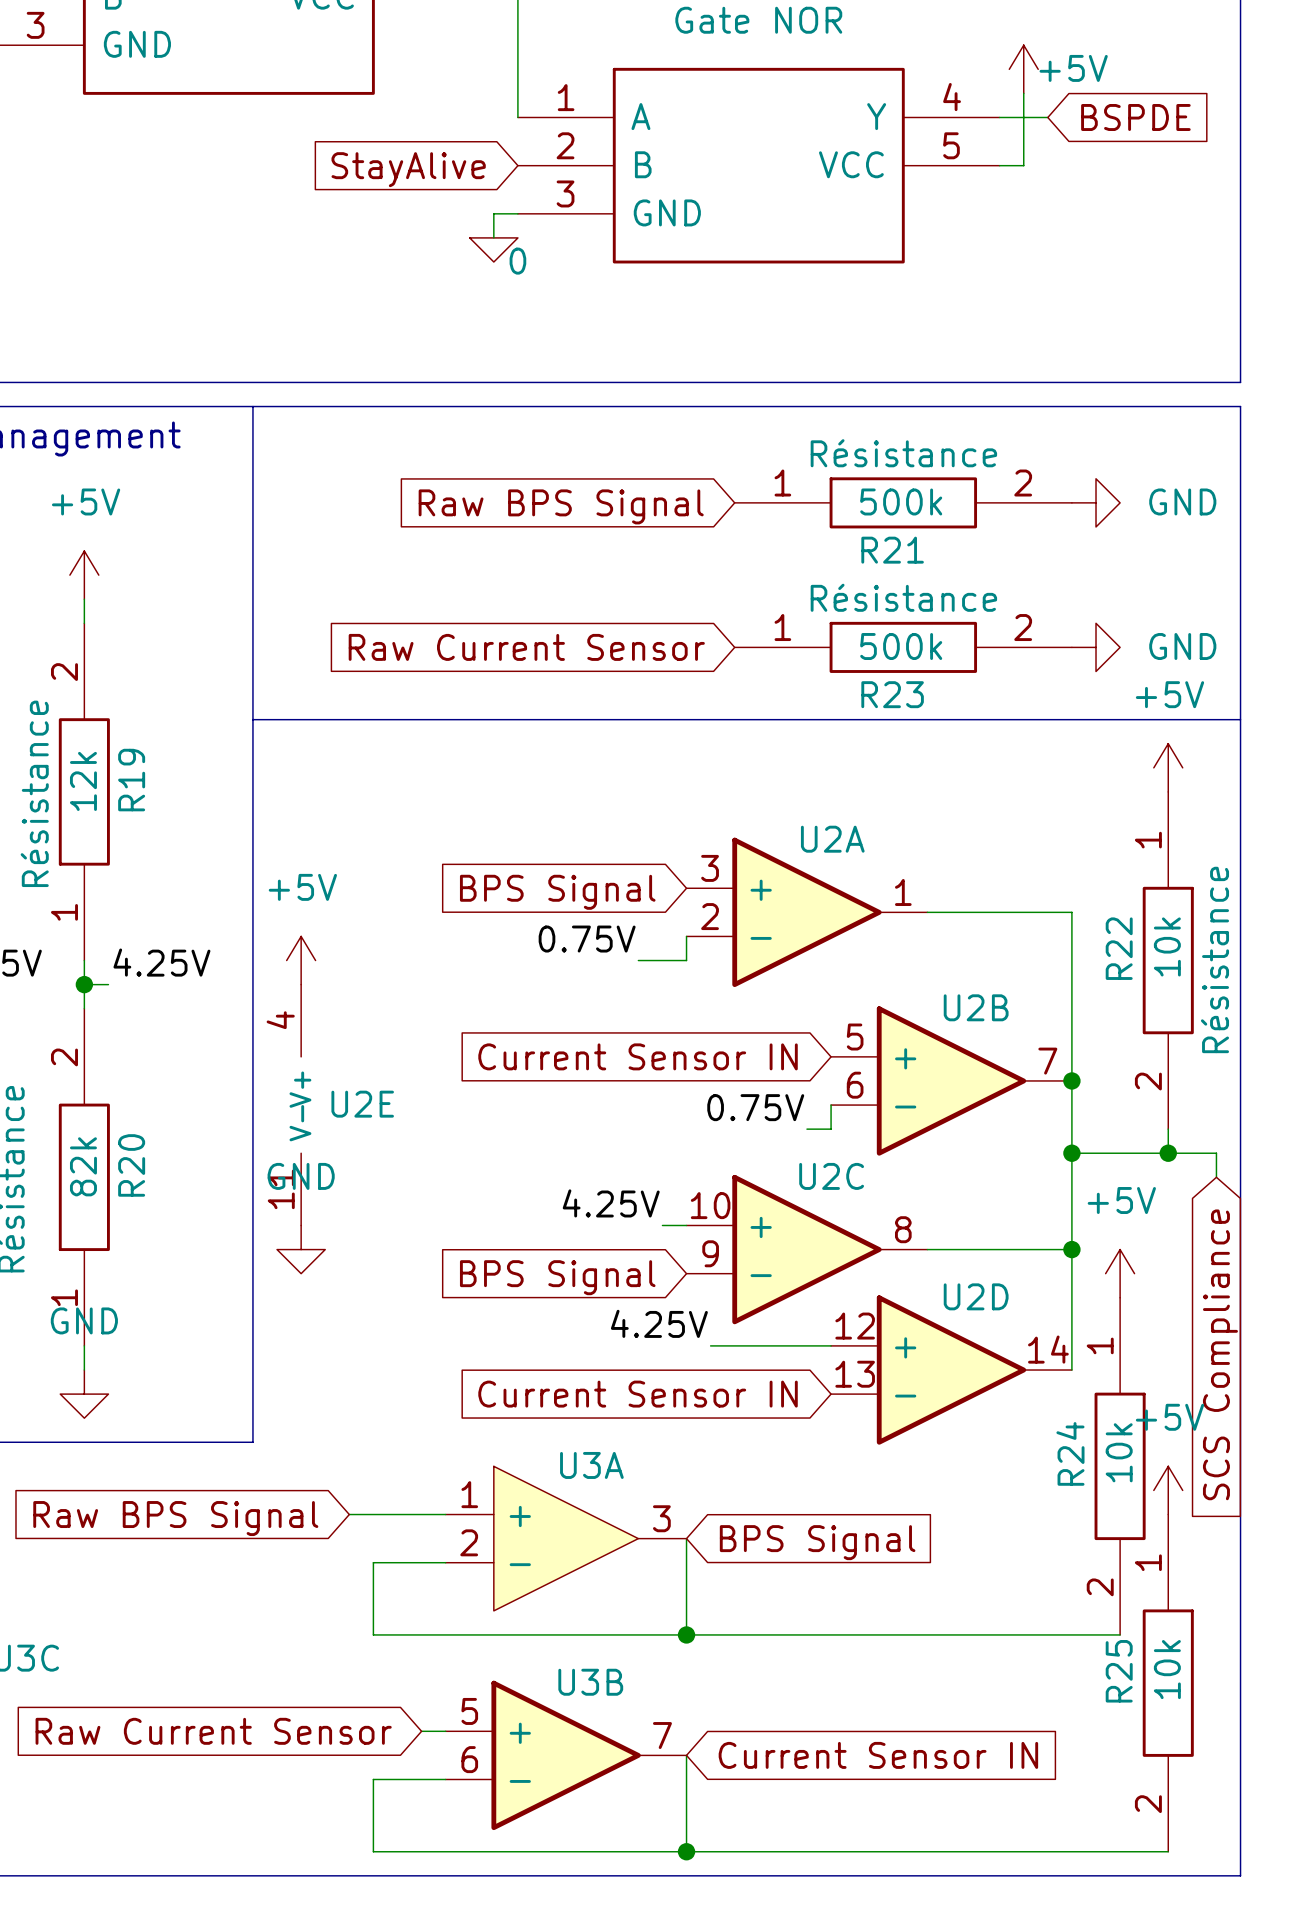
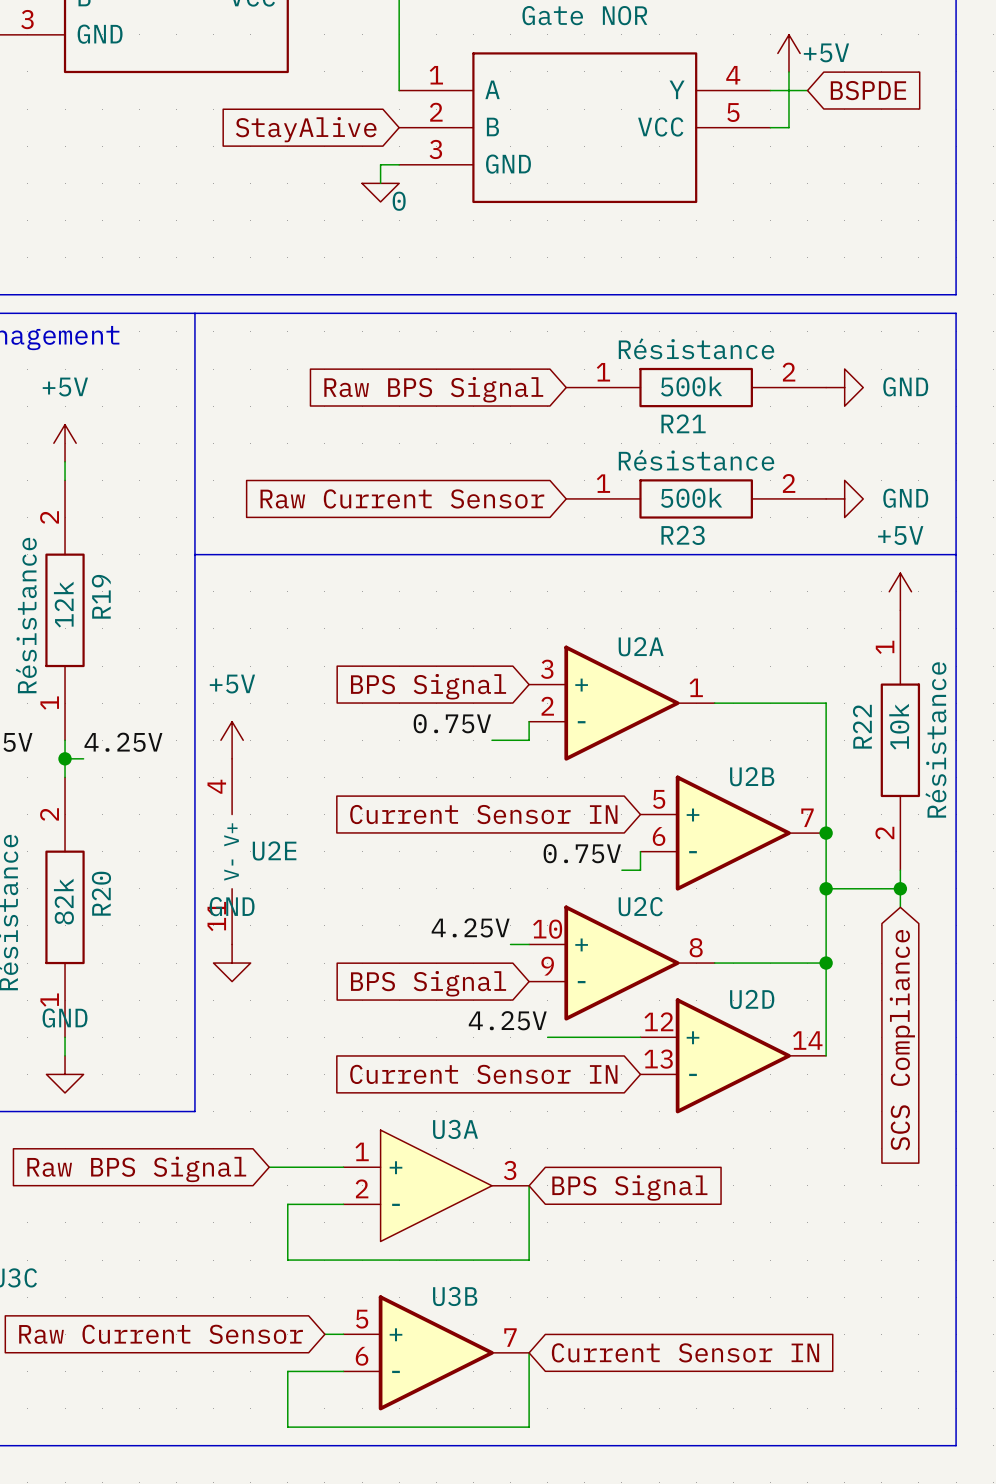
wire: (1168, 1153) (1216, 1153) (1216, 1177) -> (900, 888) (900, 907)
power symbol: +5V (1120, 1273) -> none
global label position: SCS Compliance (1220, 1354) -> SCS Compliance (902, 1040)
R24: 10k (1120, 1466) -> none
power symbol: +5V (1168, 1490) -> none
wire: (686, 1634) (1120, 1634) -> none
junction: (686, 1634) -> none
R25: 10k (1168, 1683) -> none
wire: (686, 1851) (1168, 1851) -> none
junction: (686, 1851) -> none

